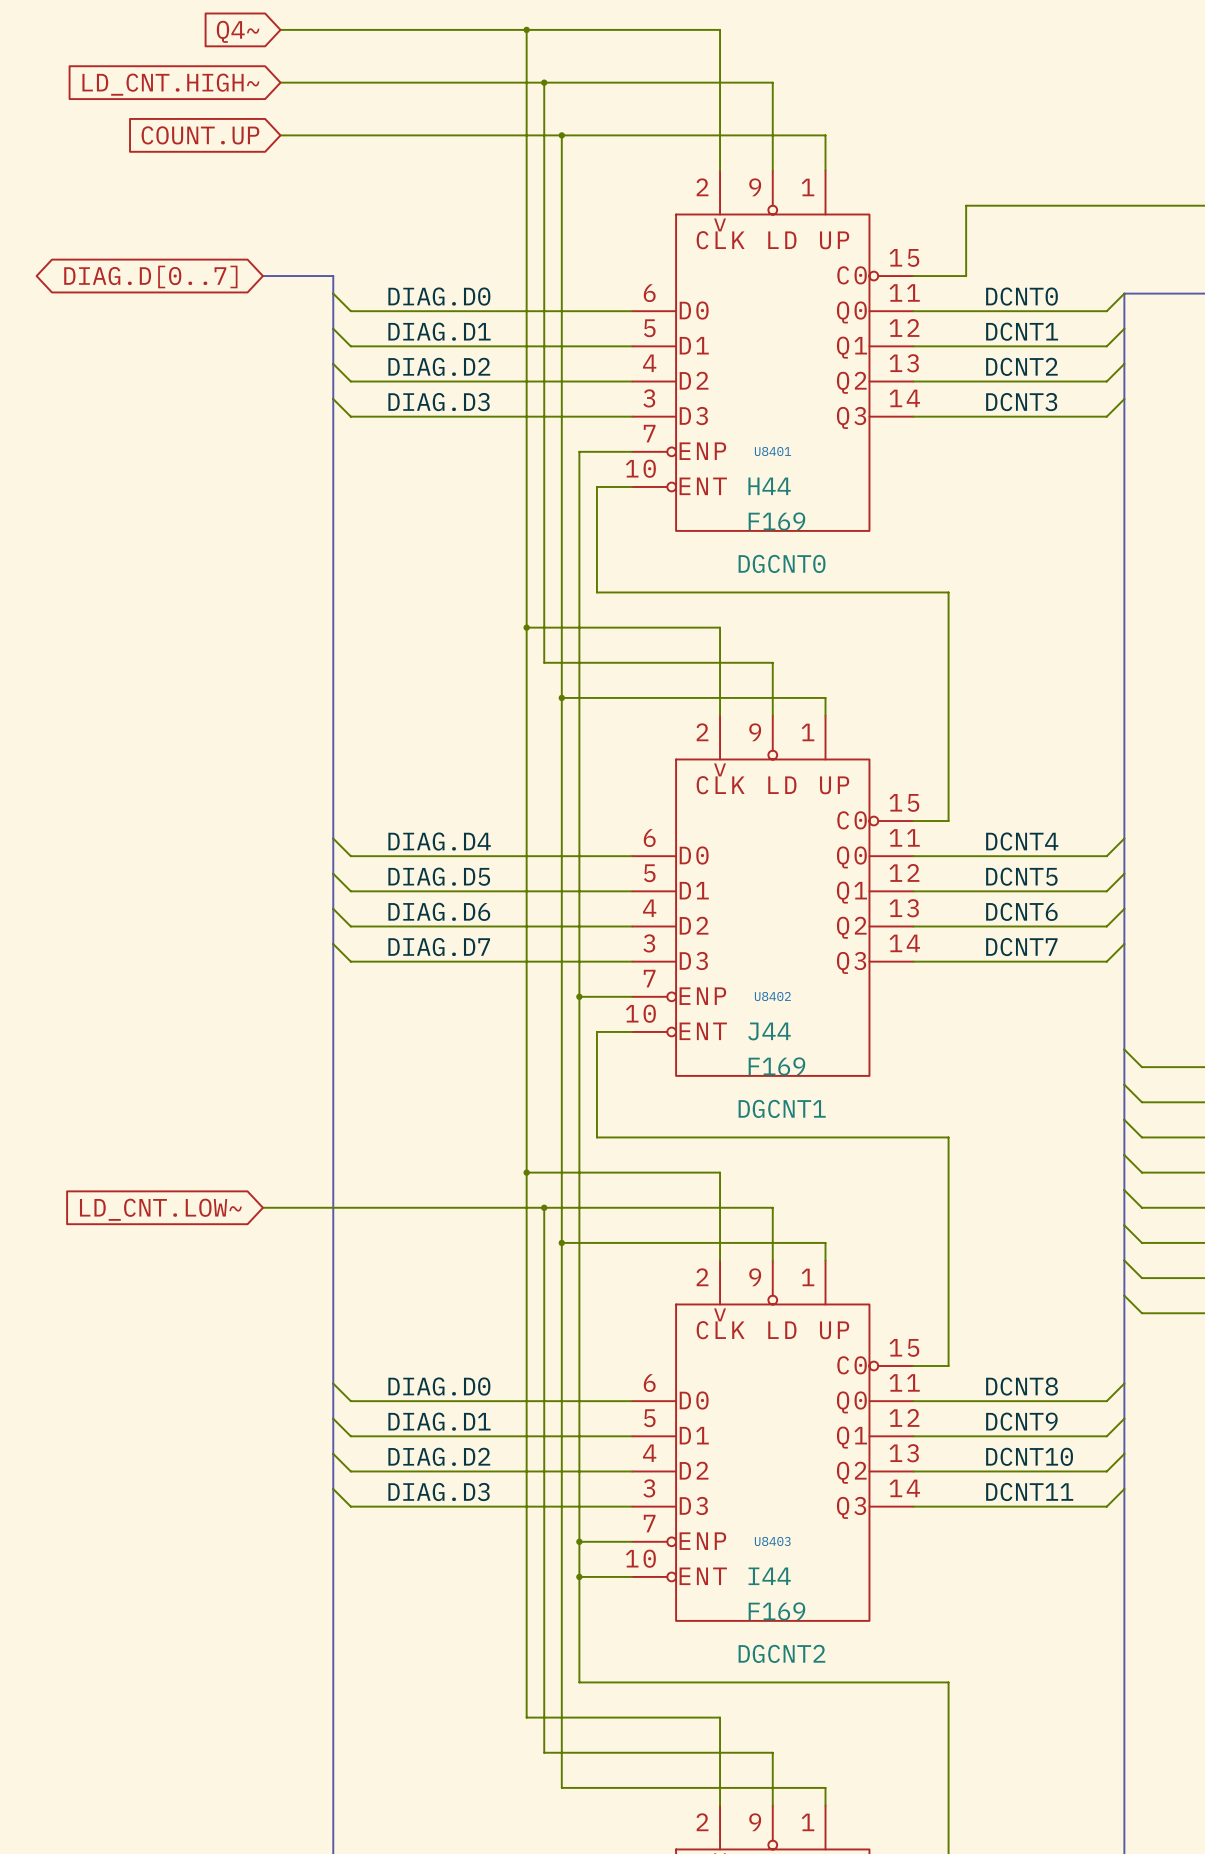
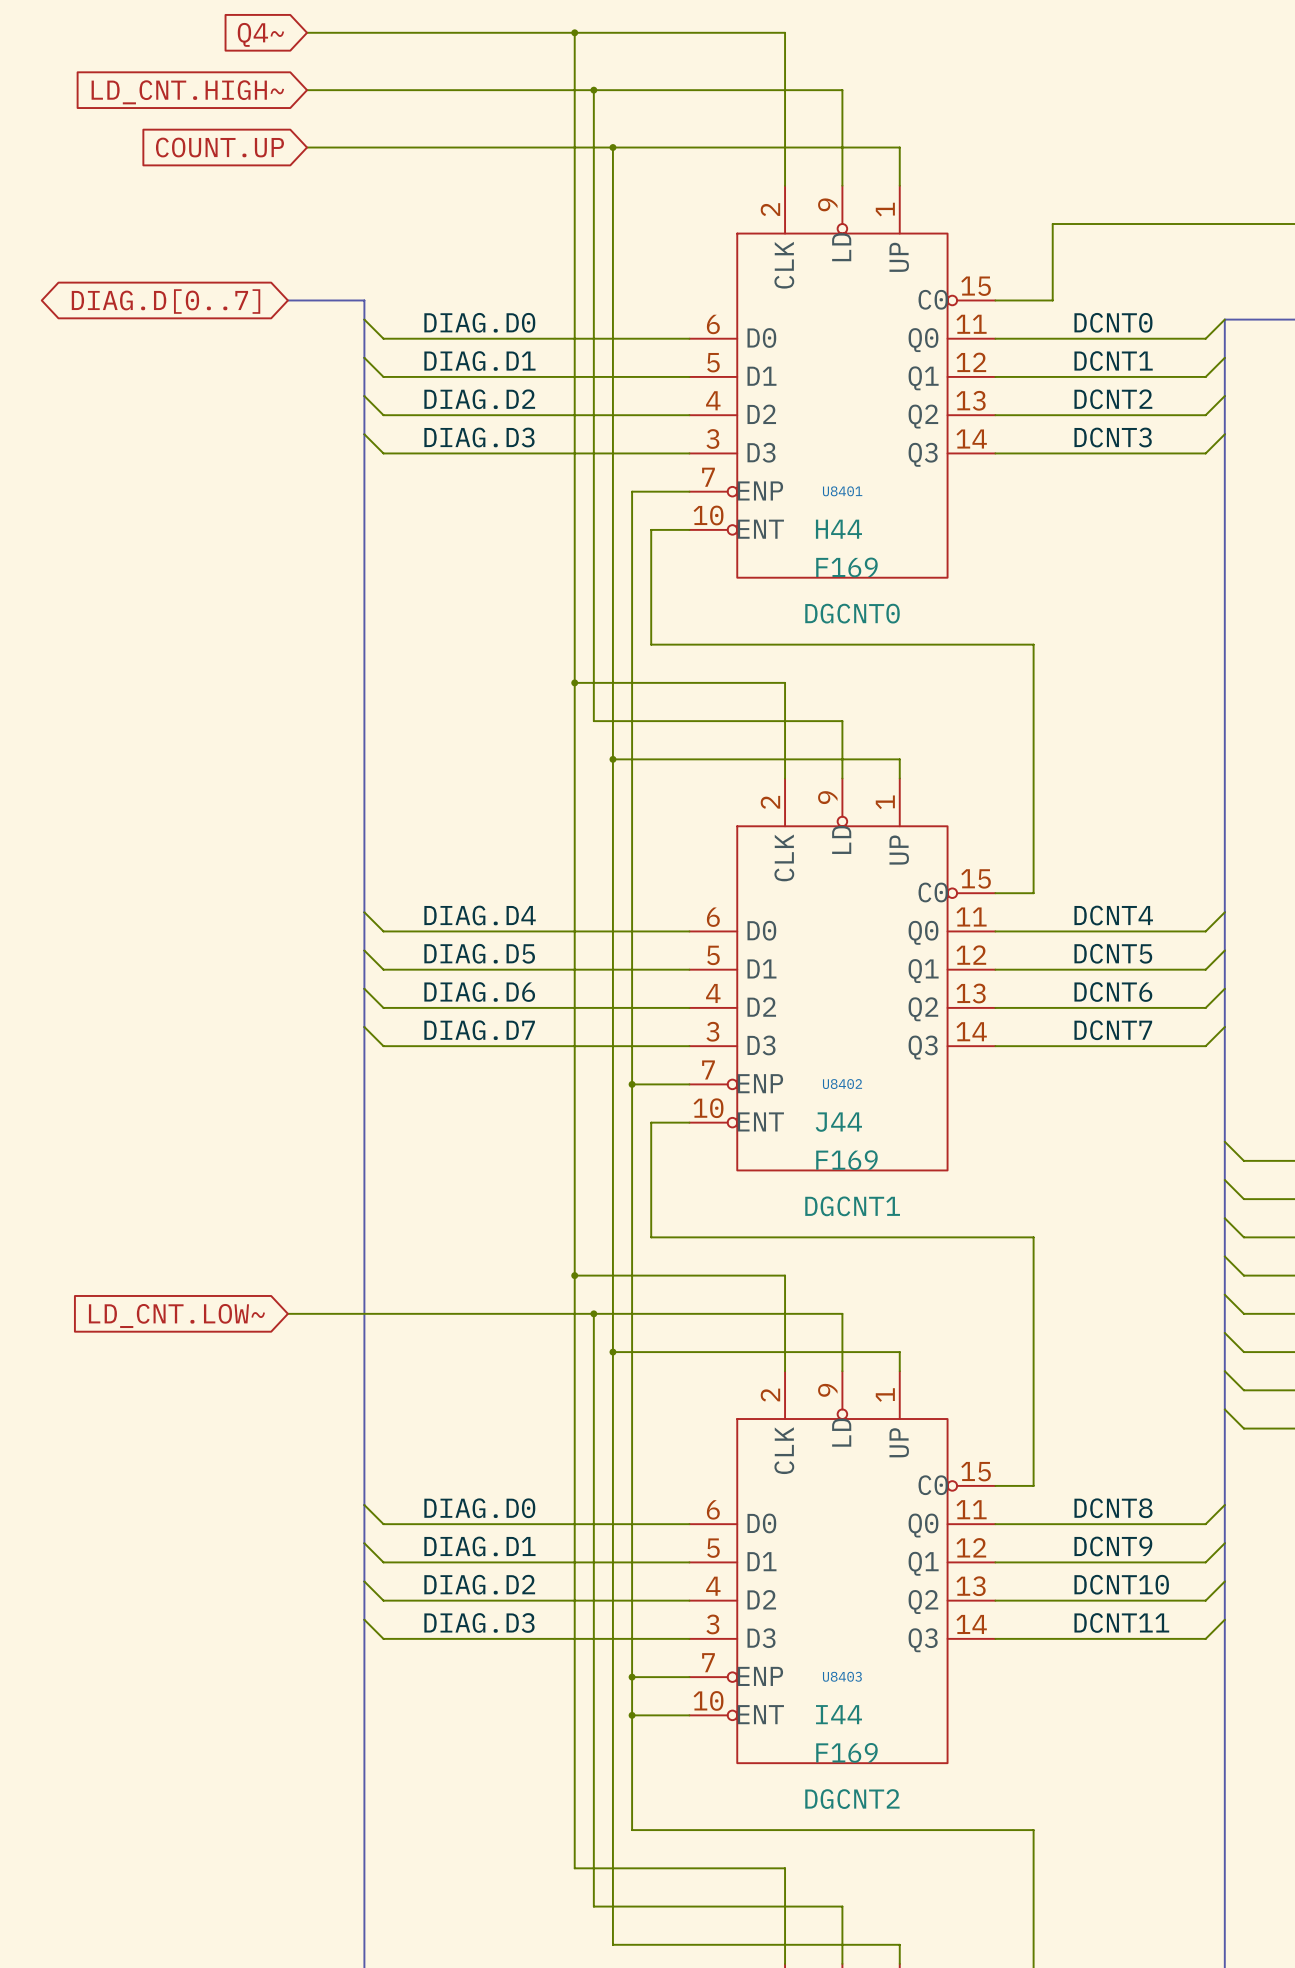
U8401 symbol: [632, 170, 914, 531] -> [689, 185, 996, 578]
U8402 symbol: [632, 715, 914, 1076] -> [689, 778, 996, 1171]
U8403 symbol: [632, 1260, 914, 1621] -> [689, 1371, 996, 1764]

